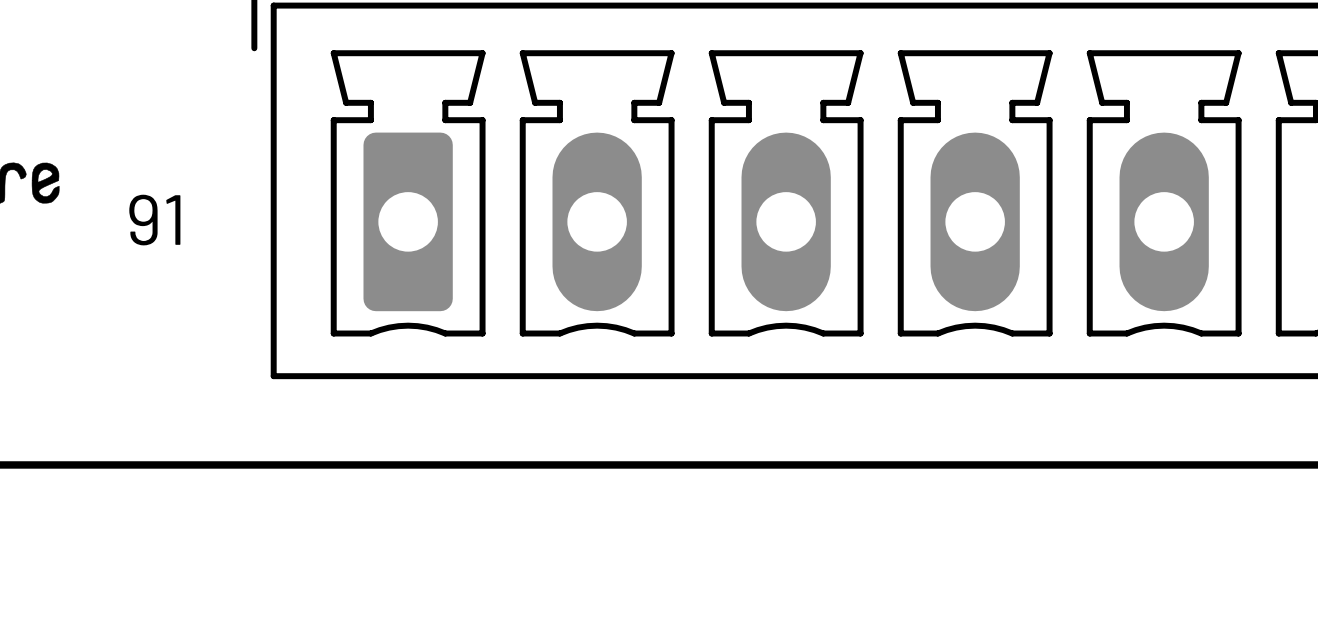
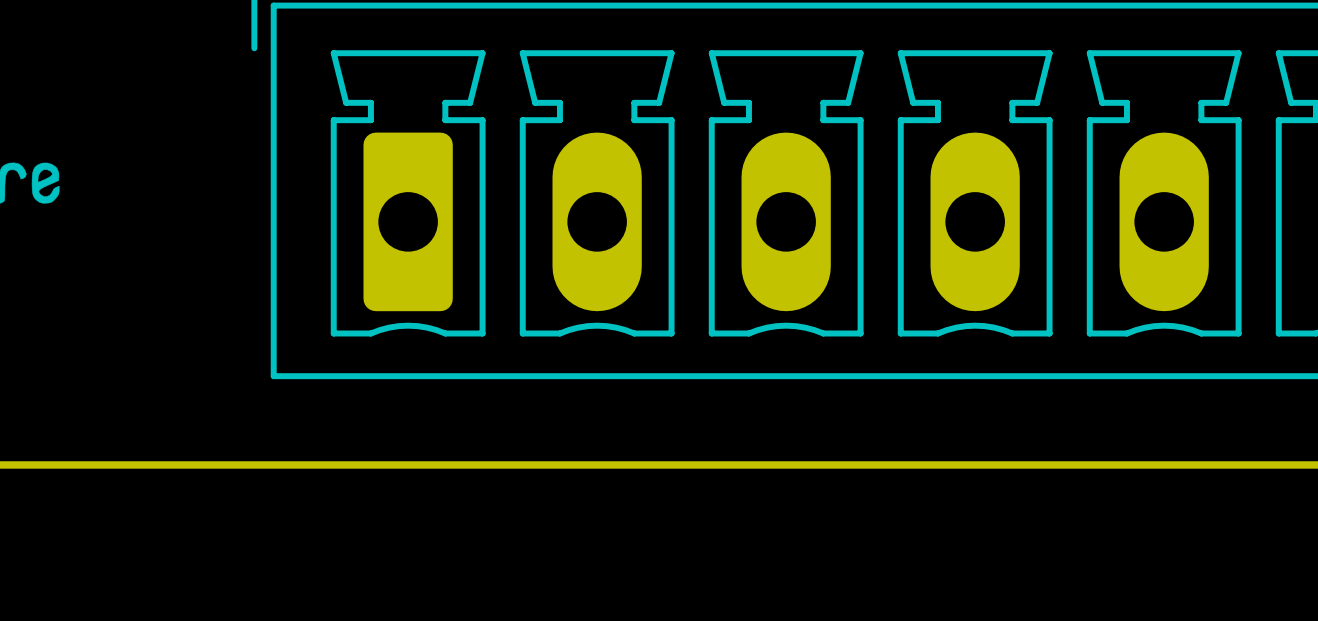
text: 91 (154, 220) -> none

